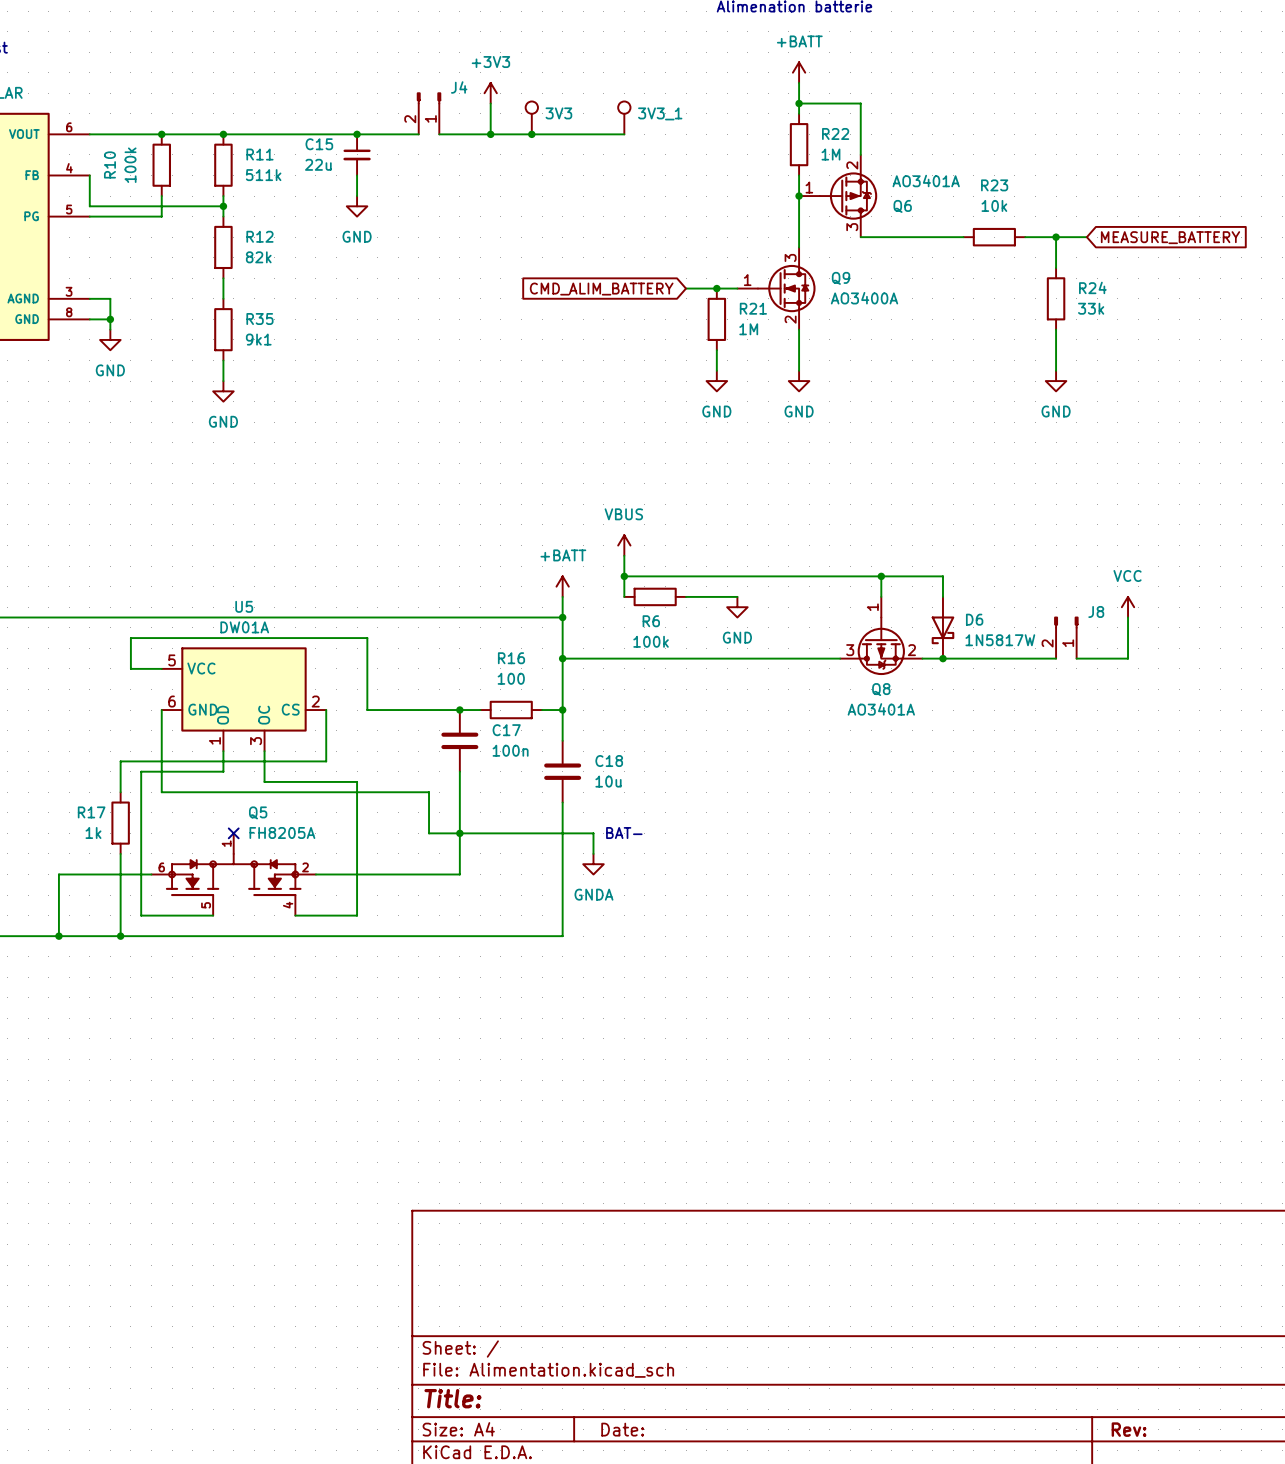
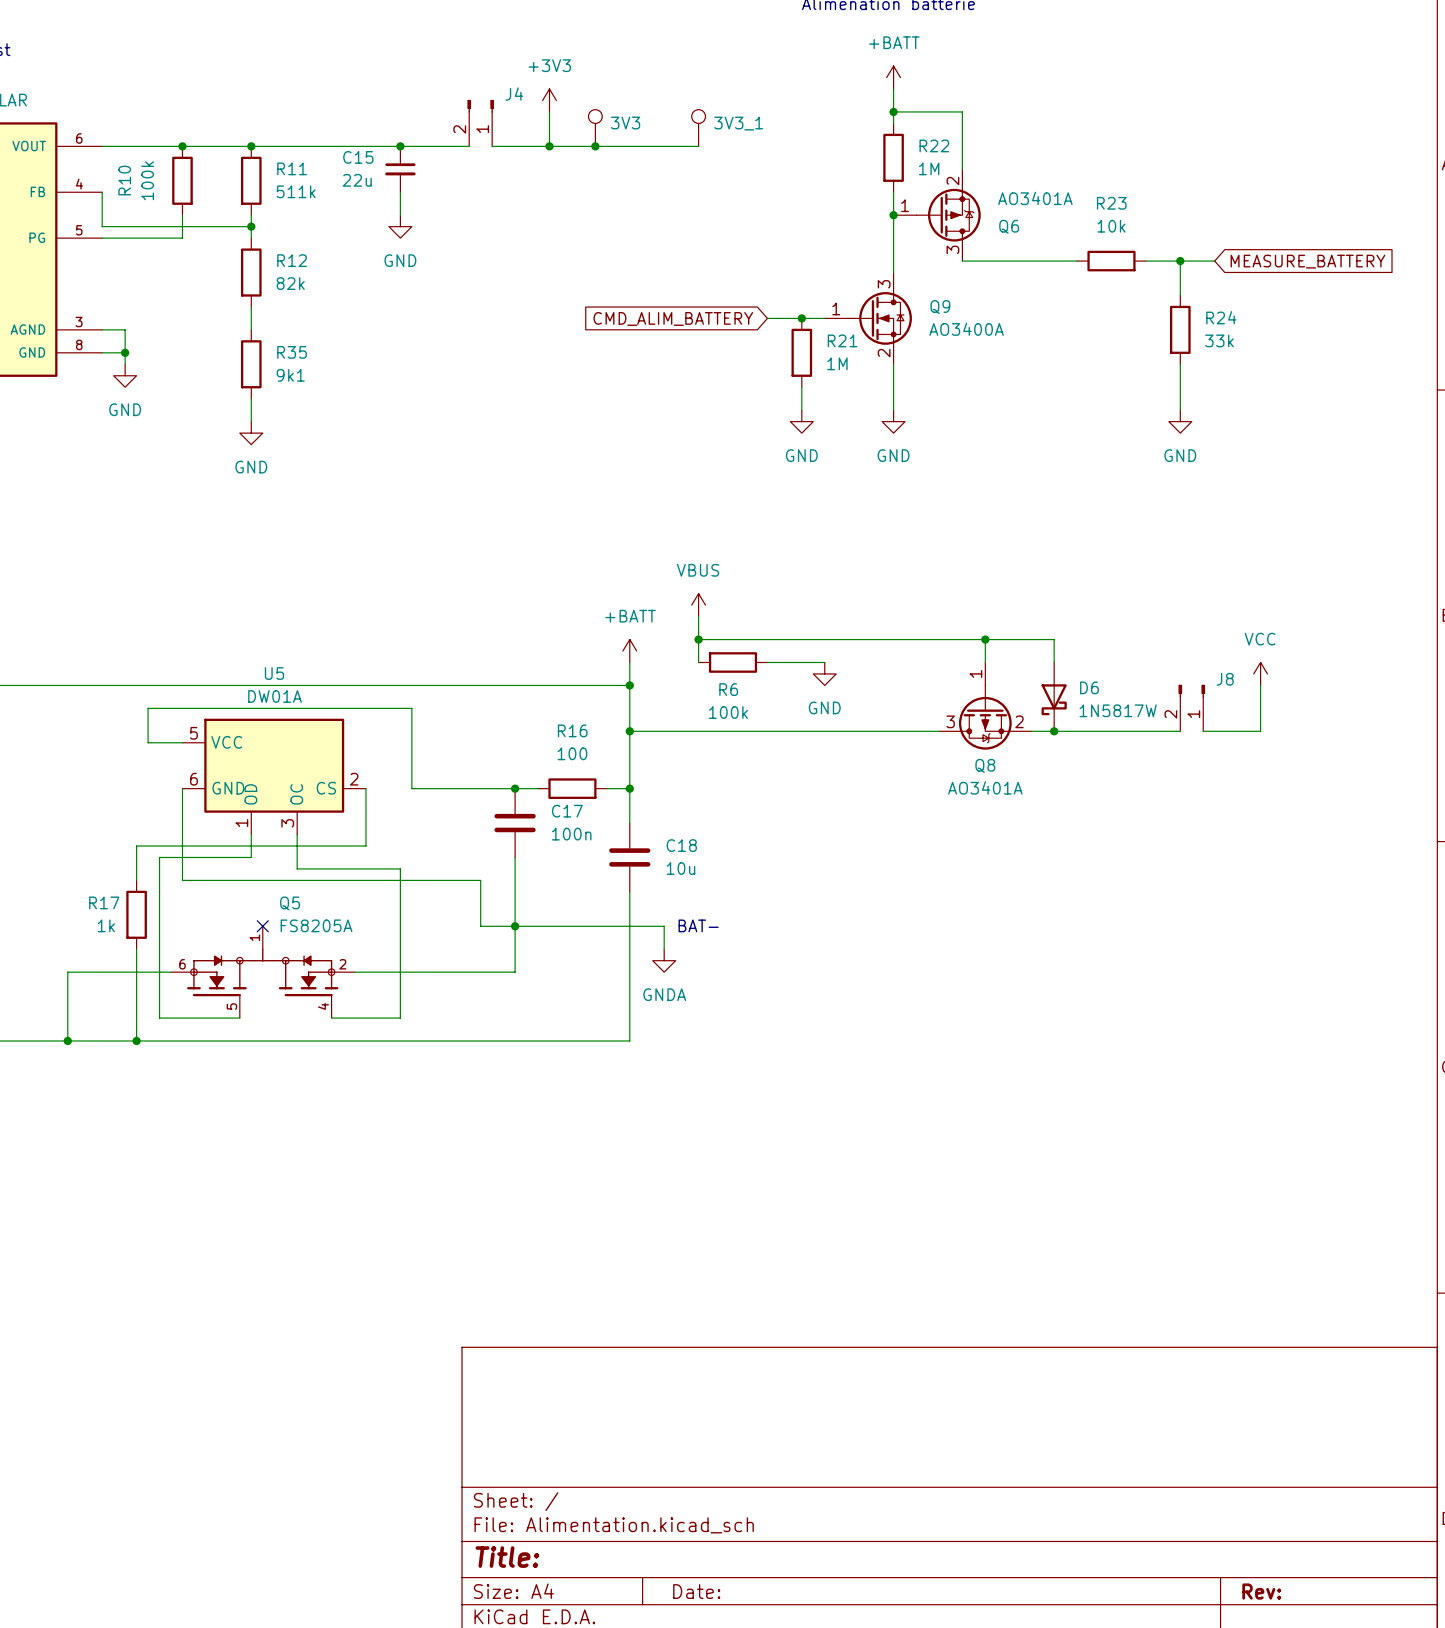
Q5 value: FH8205A (282, 832) -> FS8205A (316, 925)

